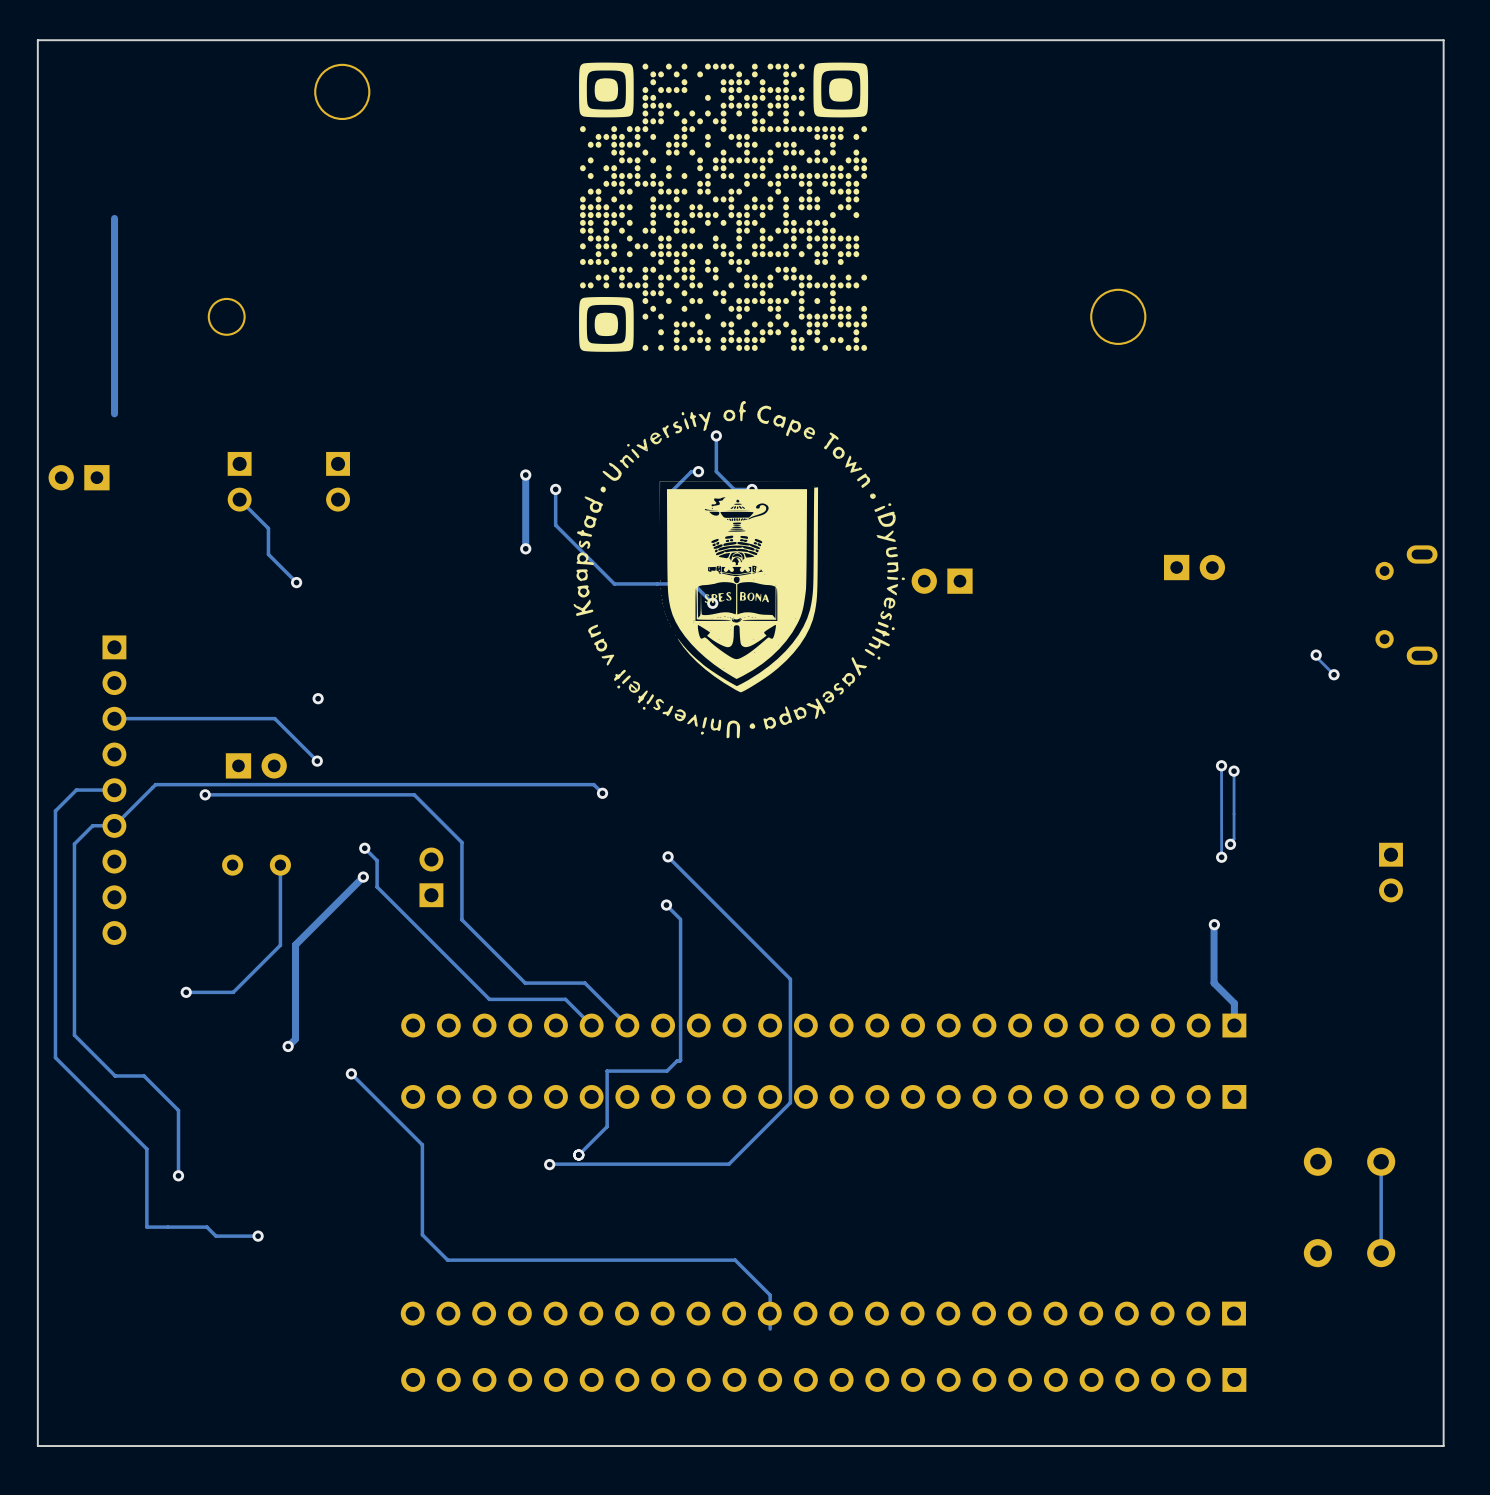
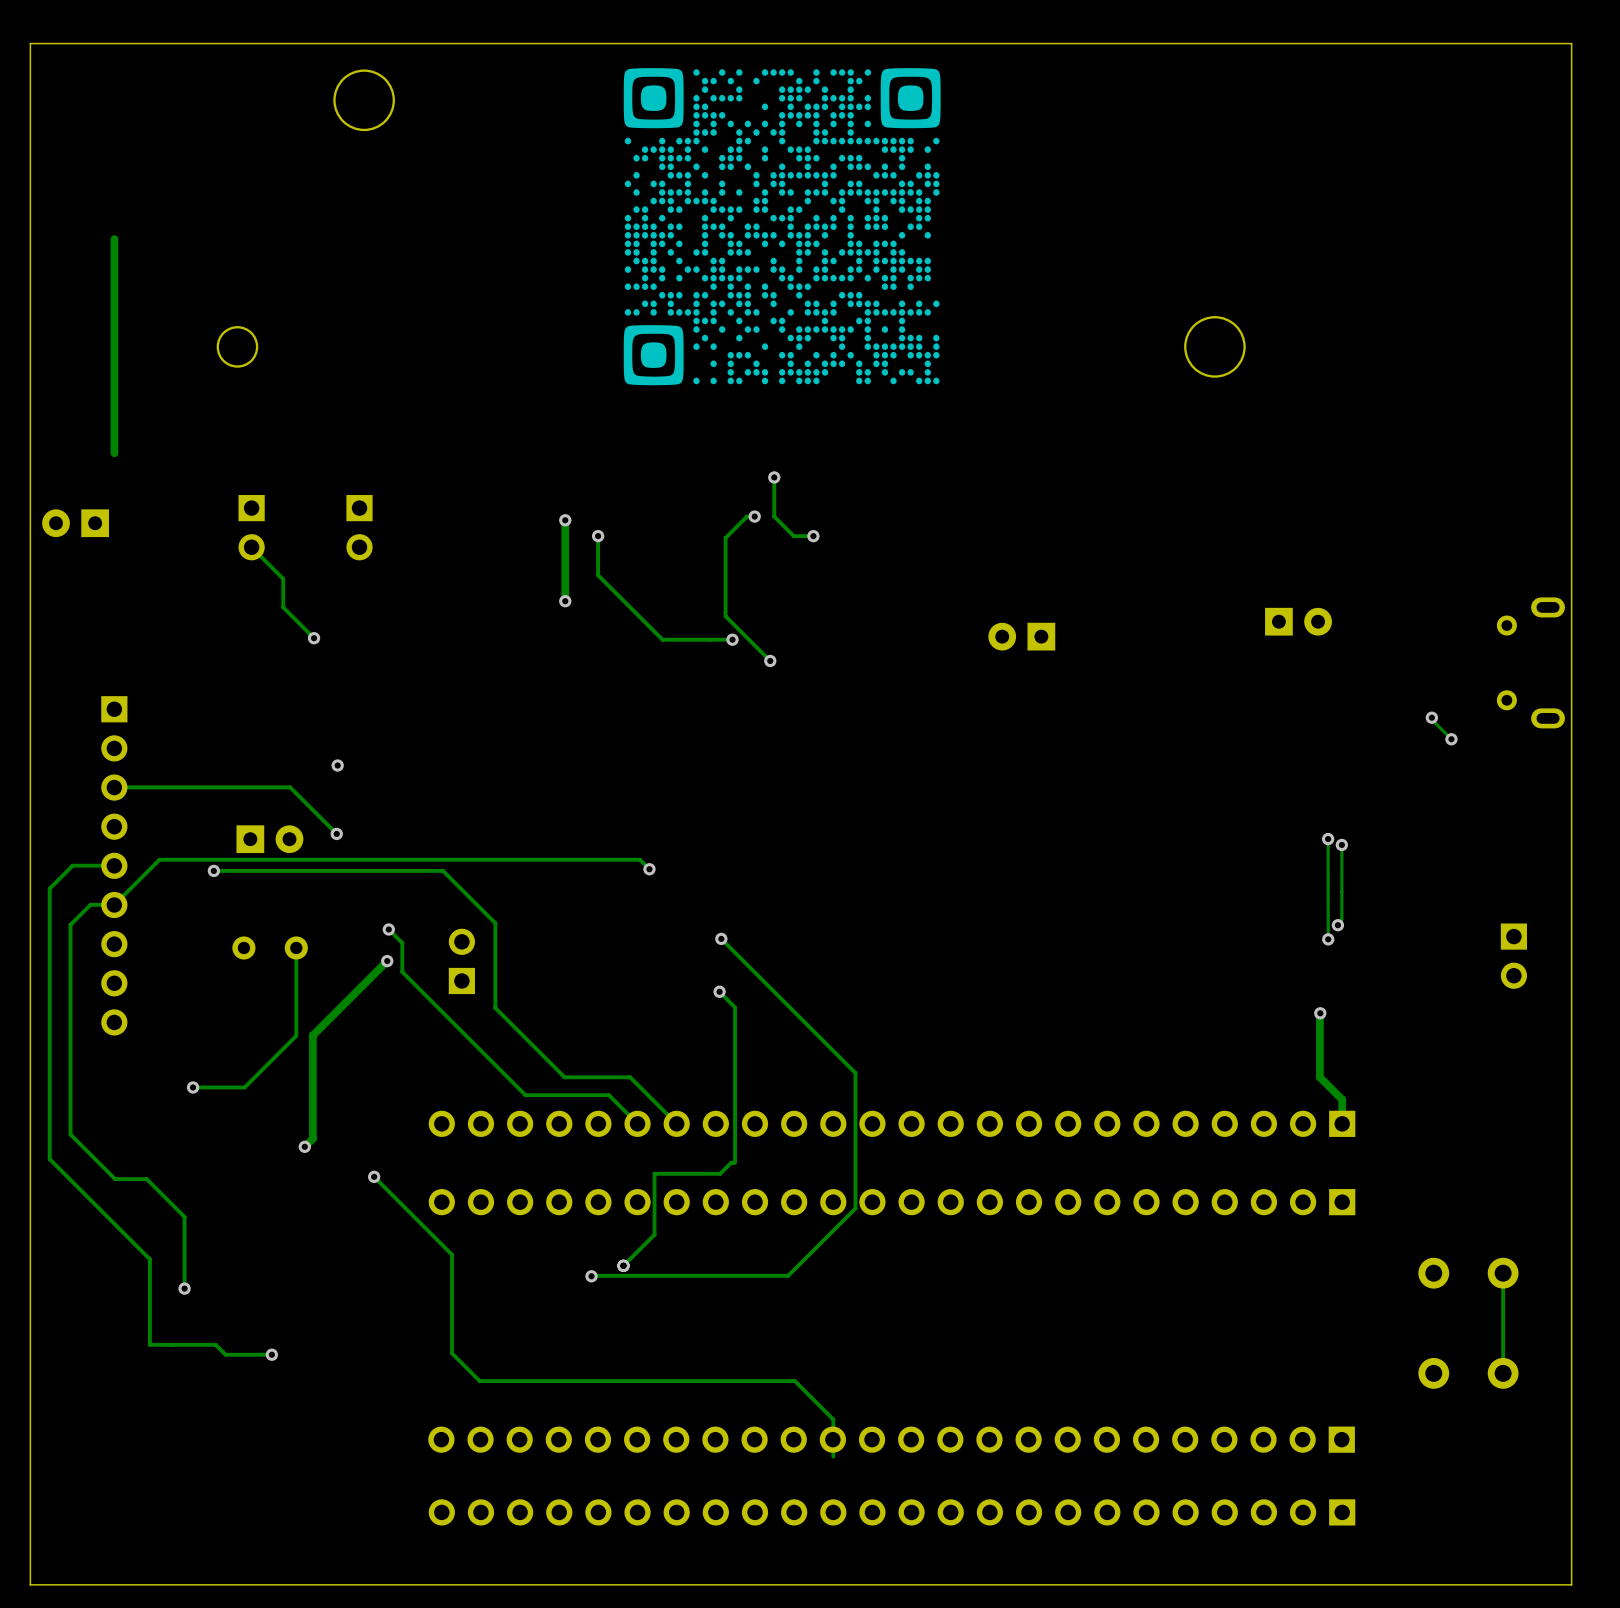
part: (739, 569) -> none

